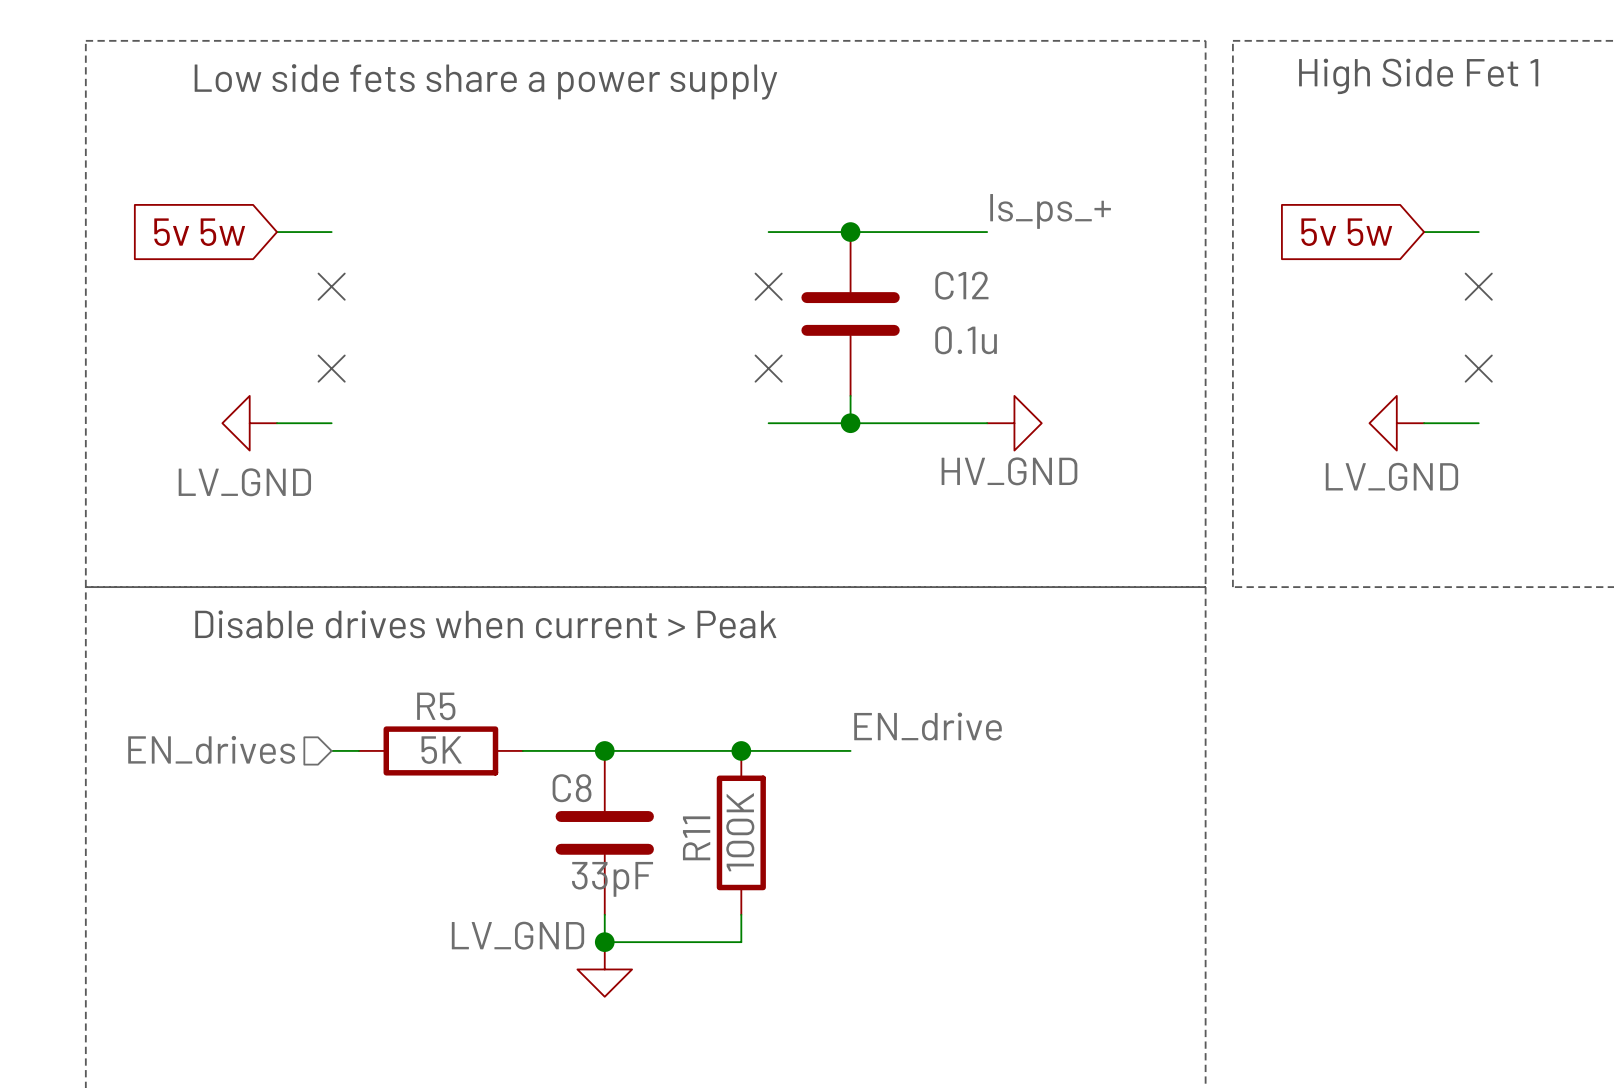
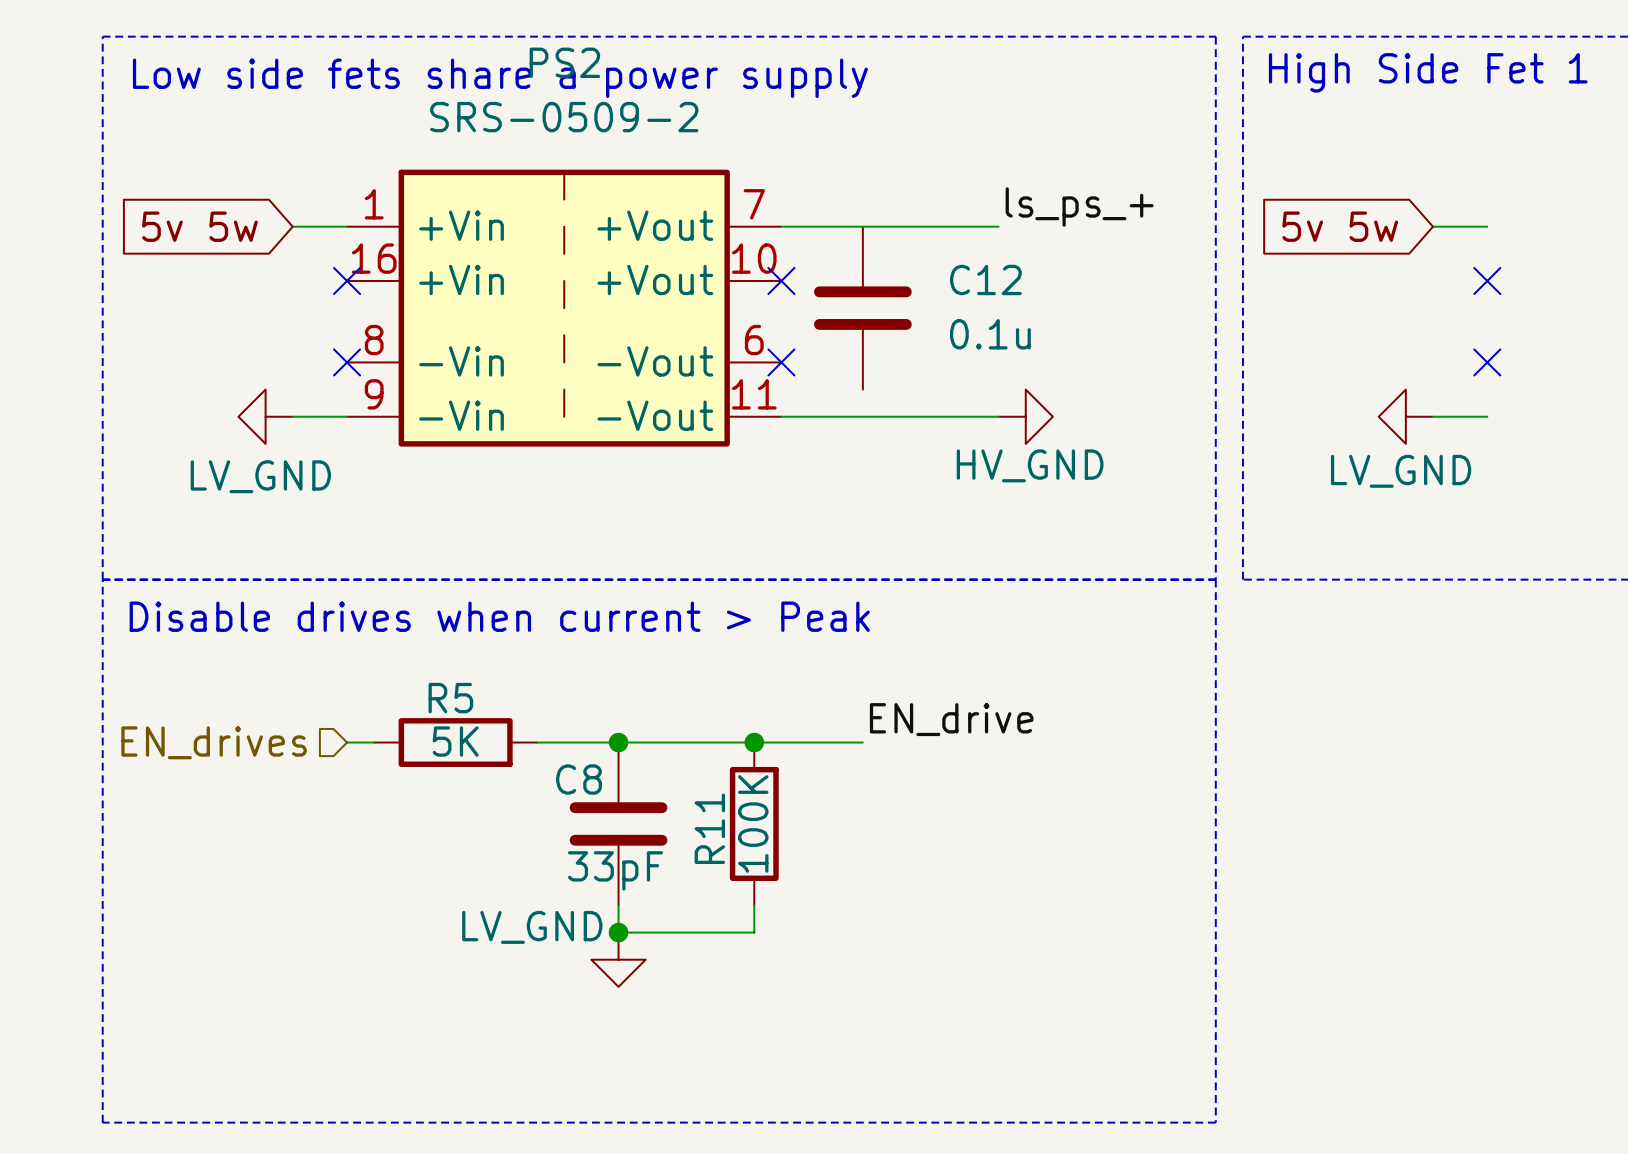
junction: (850, 232) -> none
PS2: none -> SRS-0509-2 (564, 308)
wire: (850, 395) (850, 423) -> none
junction: (850, 423) -> none

